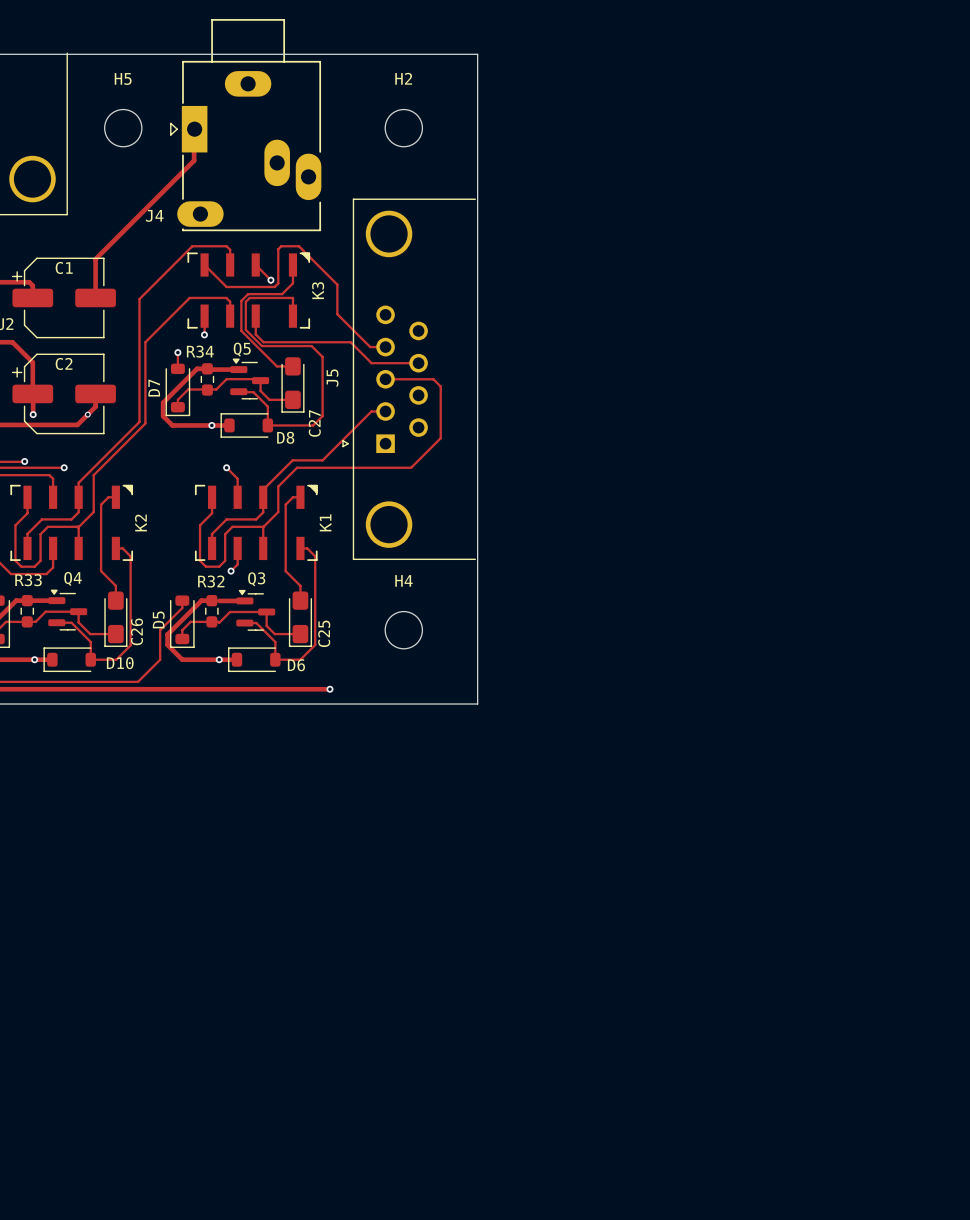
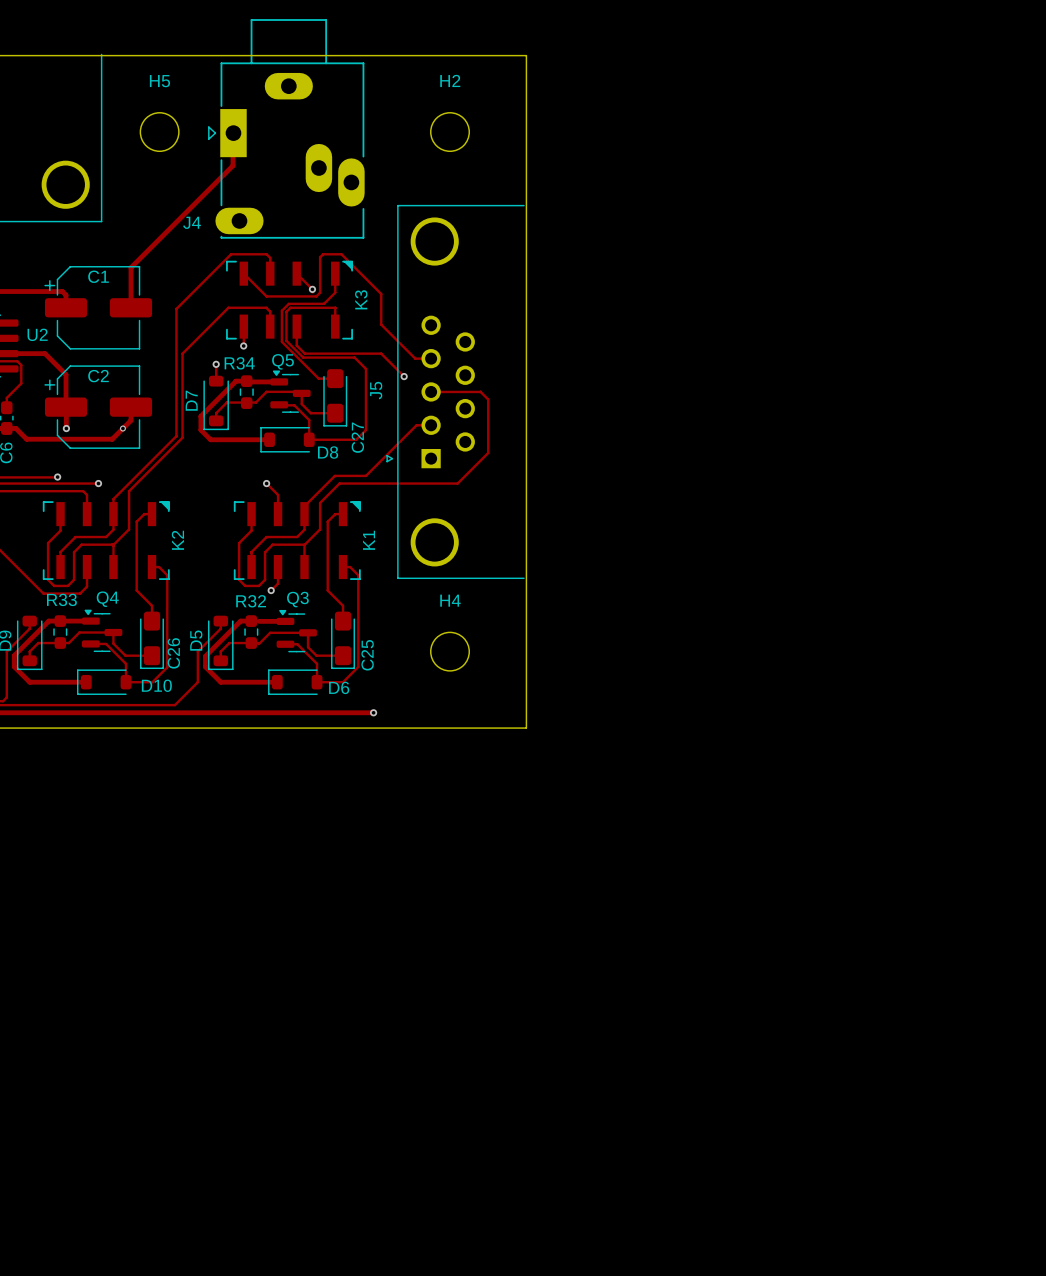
track: (337, 342) (350, 342) (371, 363) (418, 363) -> (381, 353) (404, 376)
via: none -> (404, 376)
via: (211, 425) -> none
via: (34, 659) -> none
via: (219, 659) -> none

